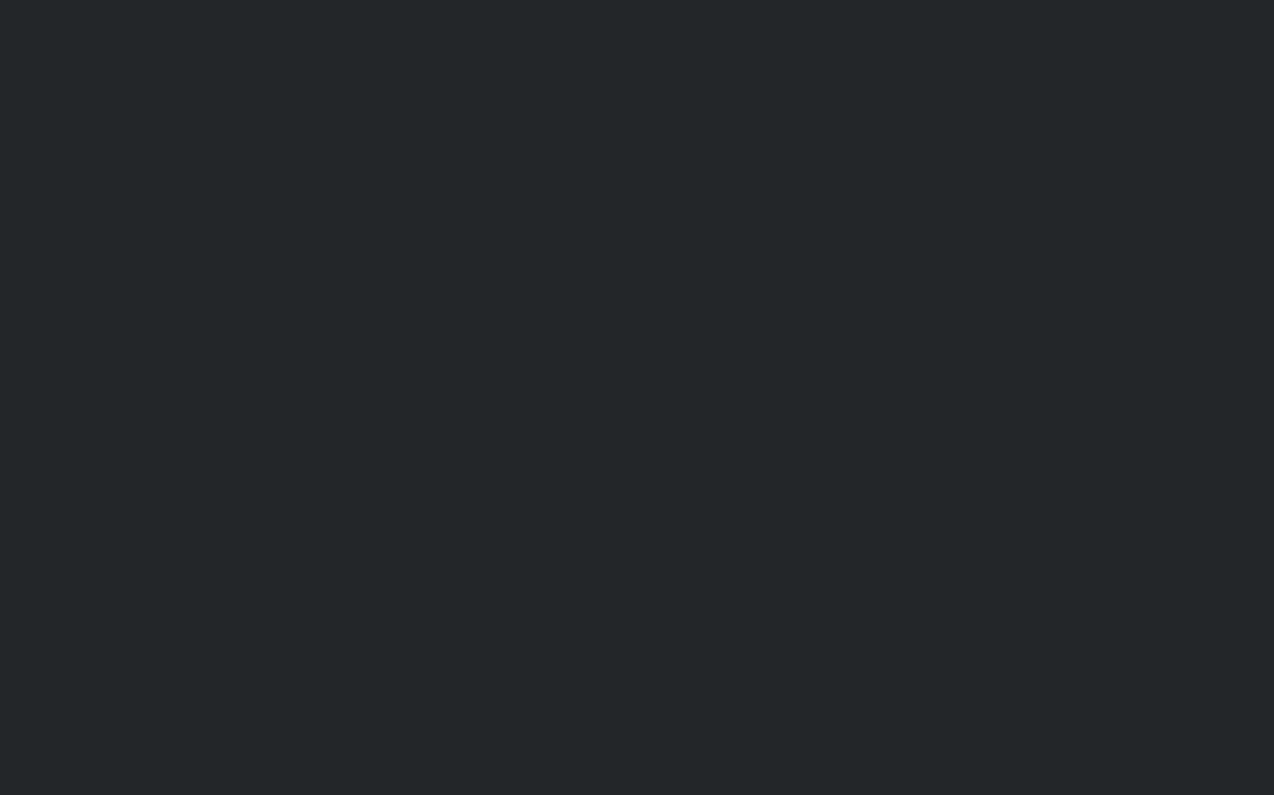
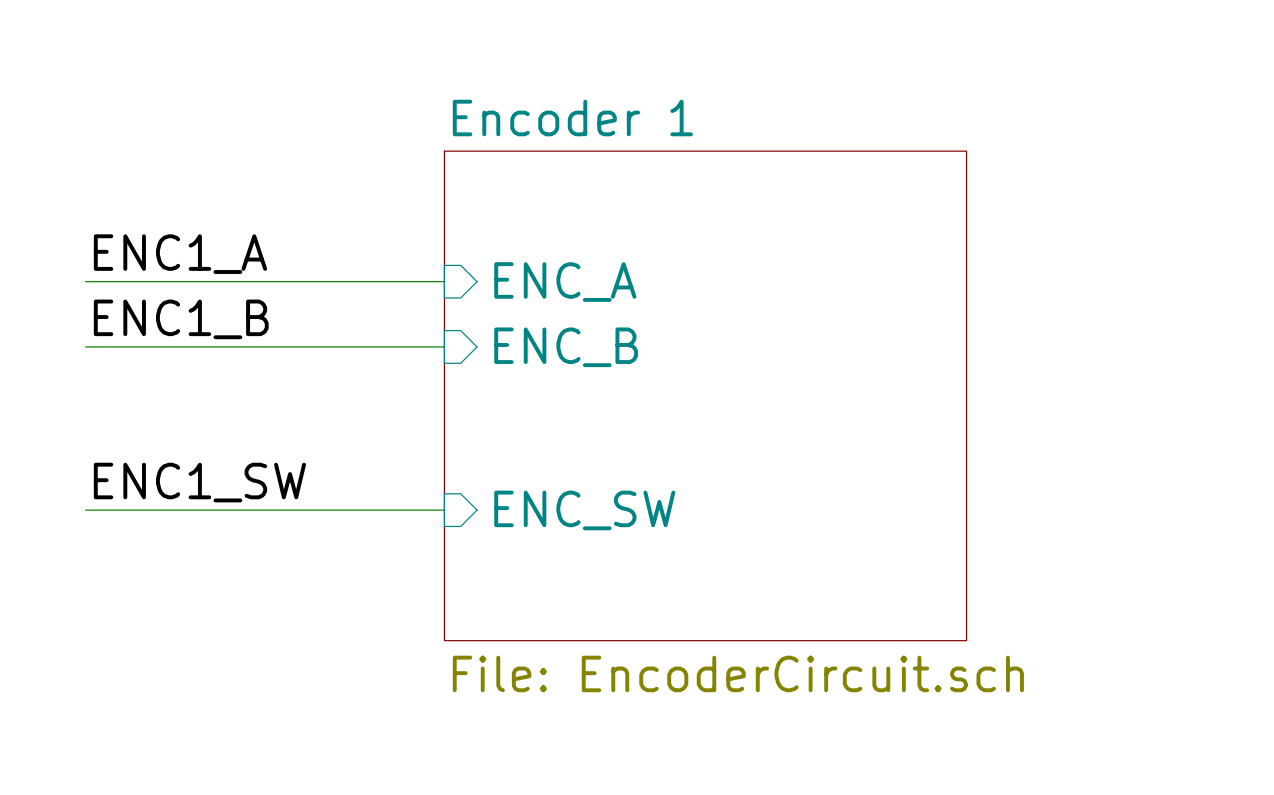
label: none -> ENC1_A (180, 254)
wire: none -> (85, 281) (444, 281)
sheet pin: none -> ENC_A (565, 282)
label: none -> ENC1_B (181, 319)
wire: none -> (85, 346) (444, 346)
sheet pin: none -> ENC_B (566, 347)
sheet Encoder 1: none -> File: EncoderCircuit.sch (705, 395)
label: none -> ENC1_SW (199, 482)
wire: none -> (85, 510) (444, 510)
sheet pin: none -> ENC_SW (584, 510)

